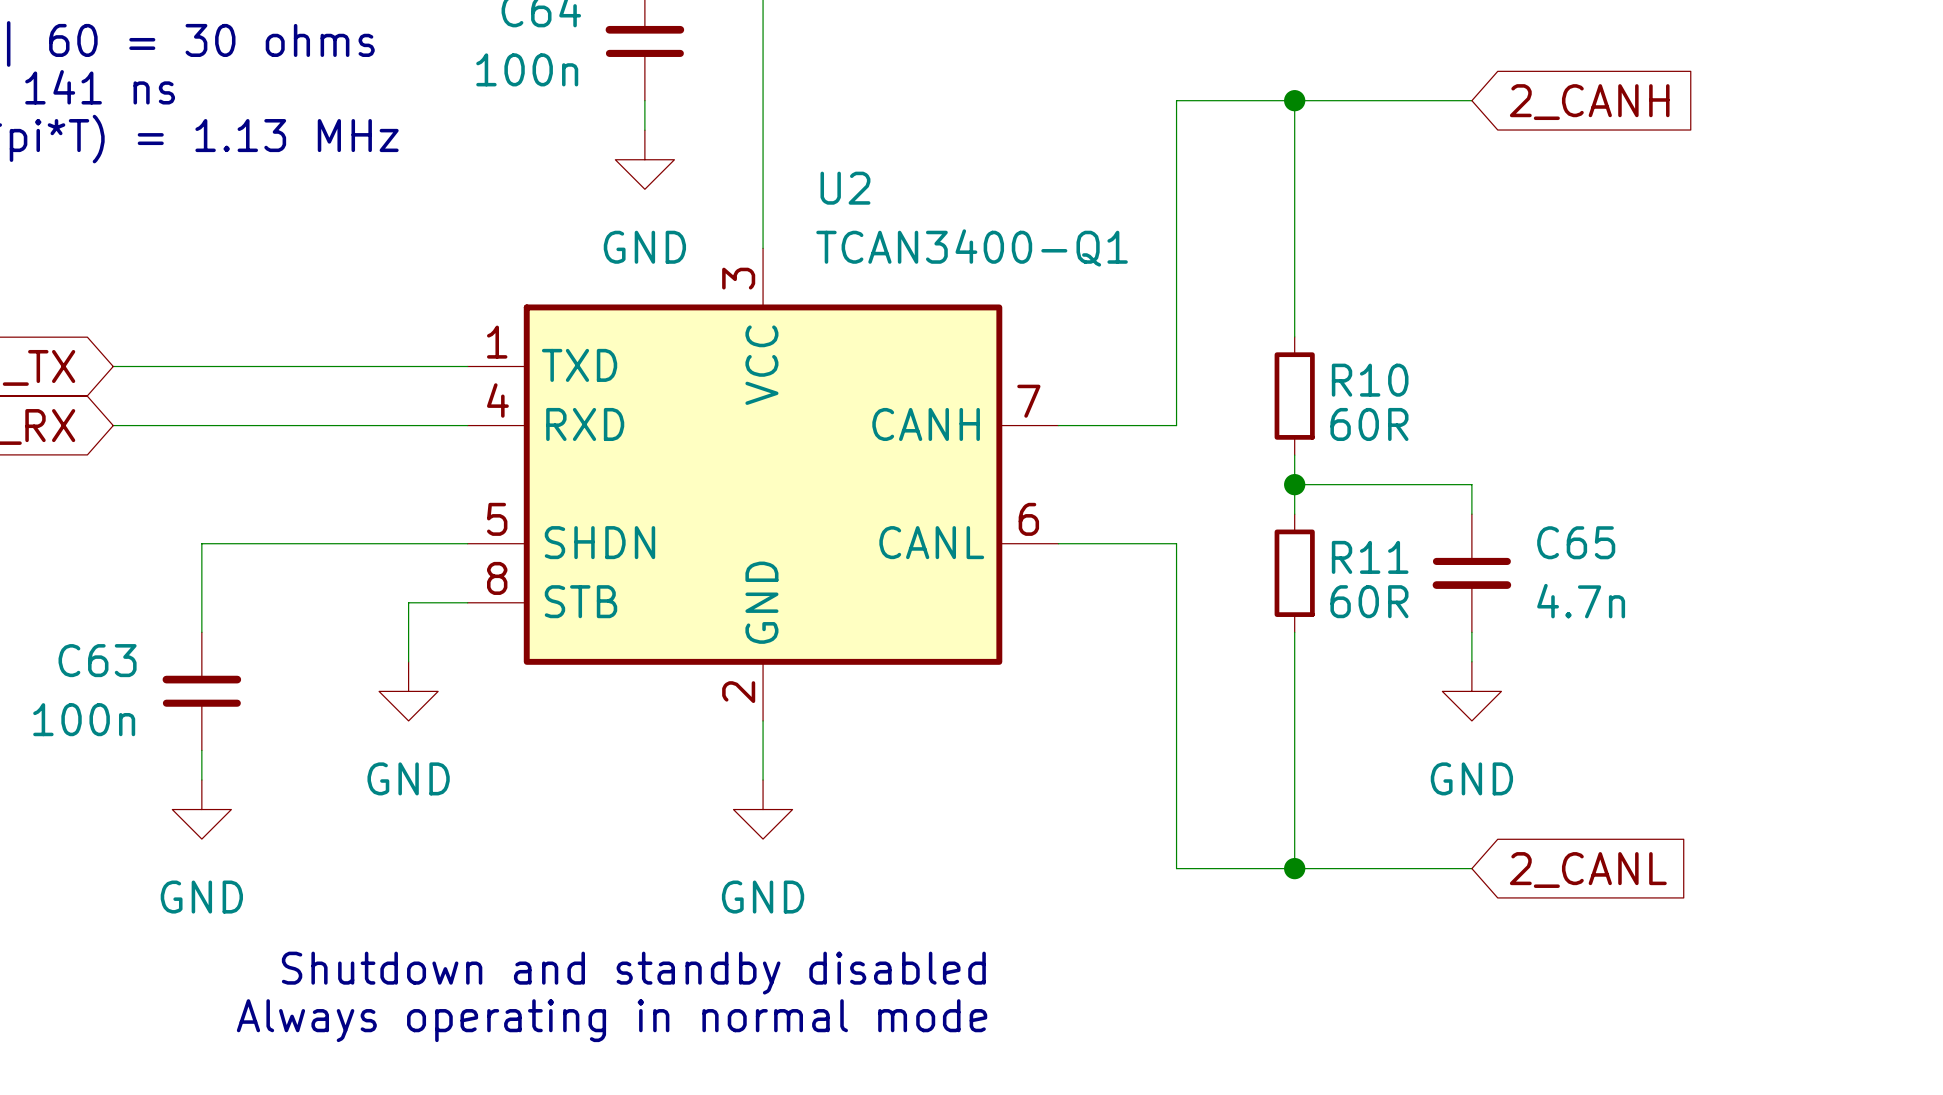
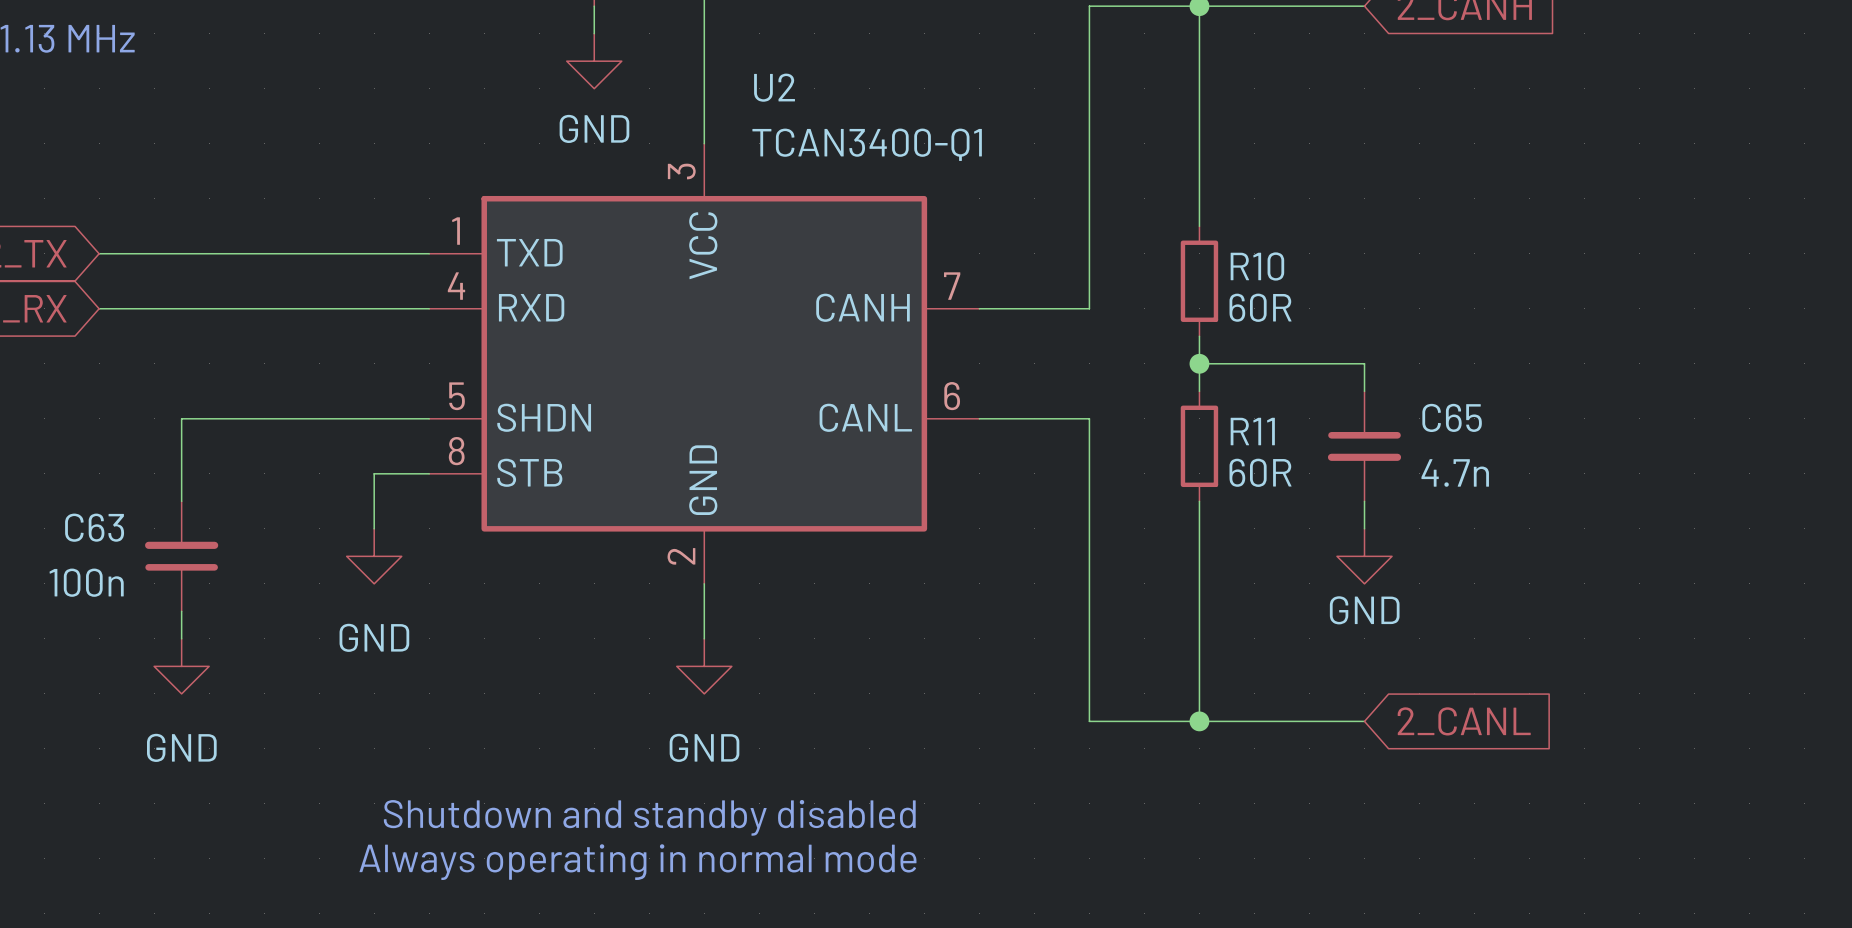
power symbol text position: GND (644, 247) -> GND (594, 128)
power symbol text position: GND (1471, 778) -> GND (1364, 610)

